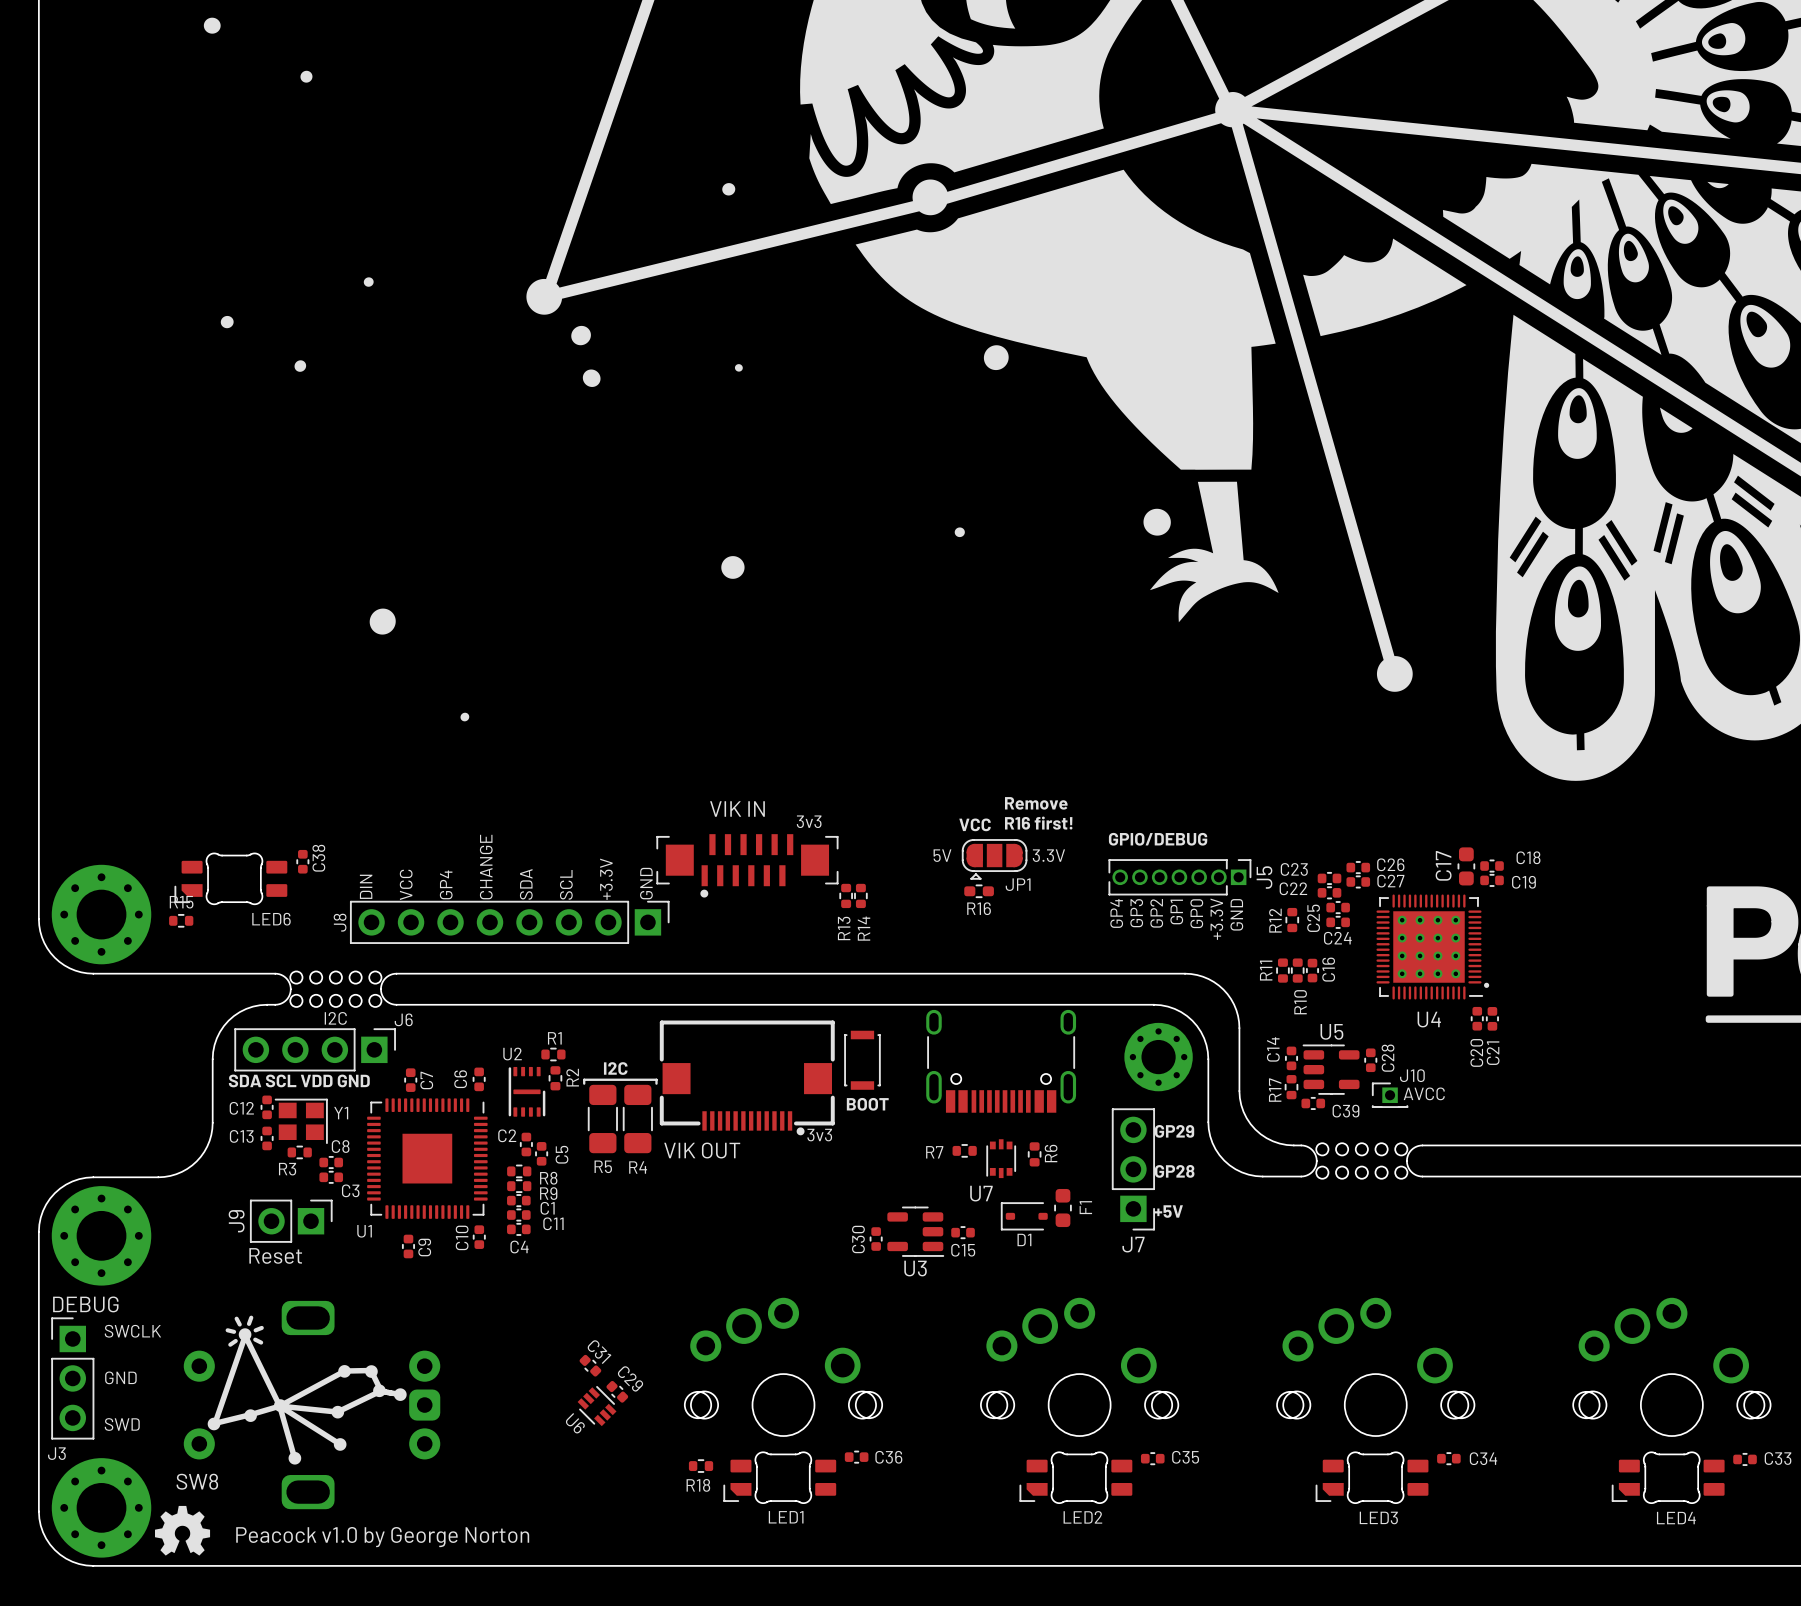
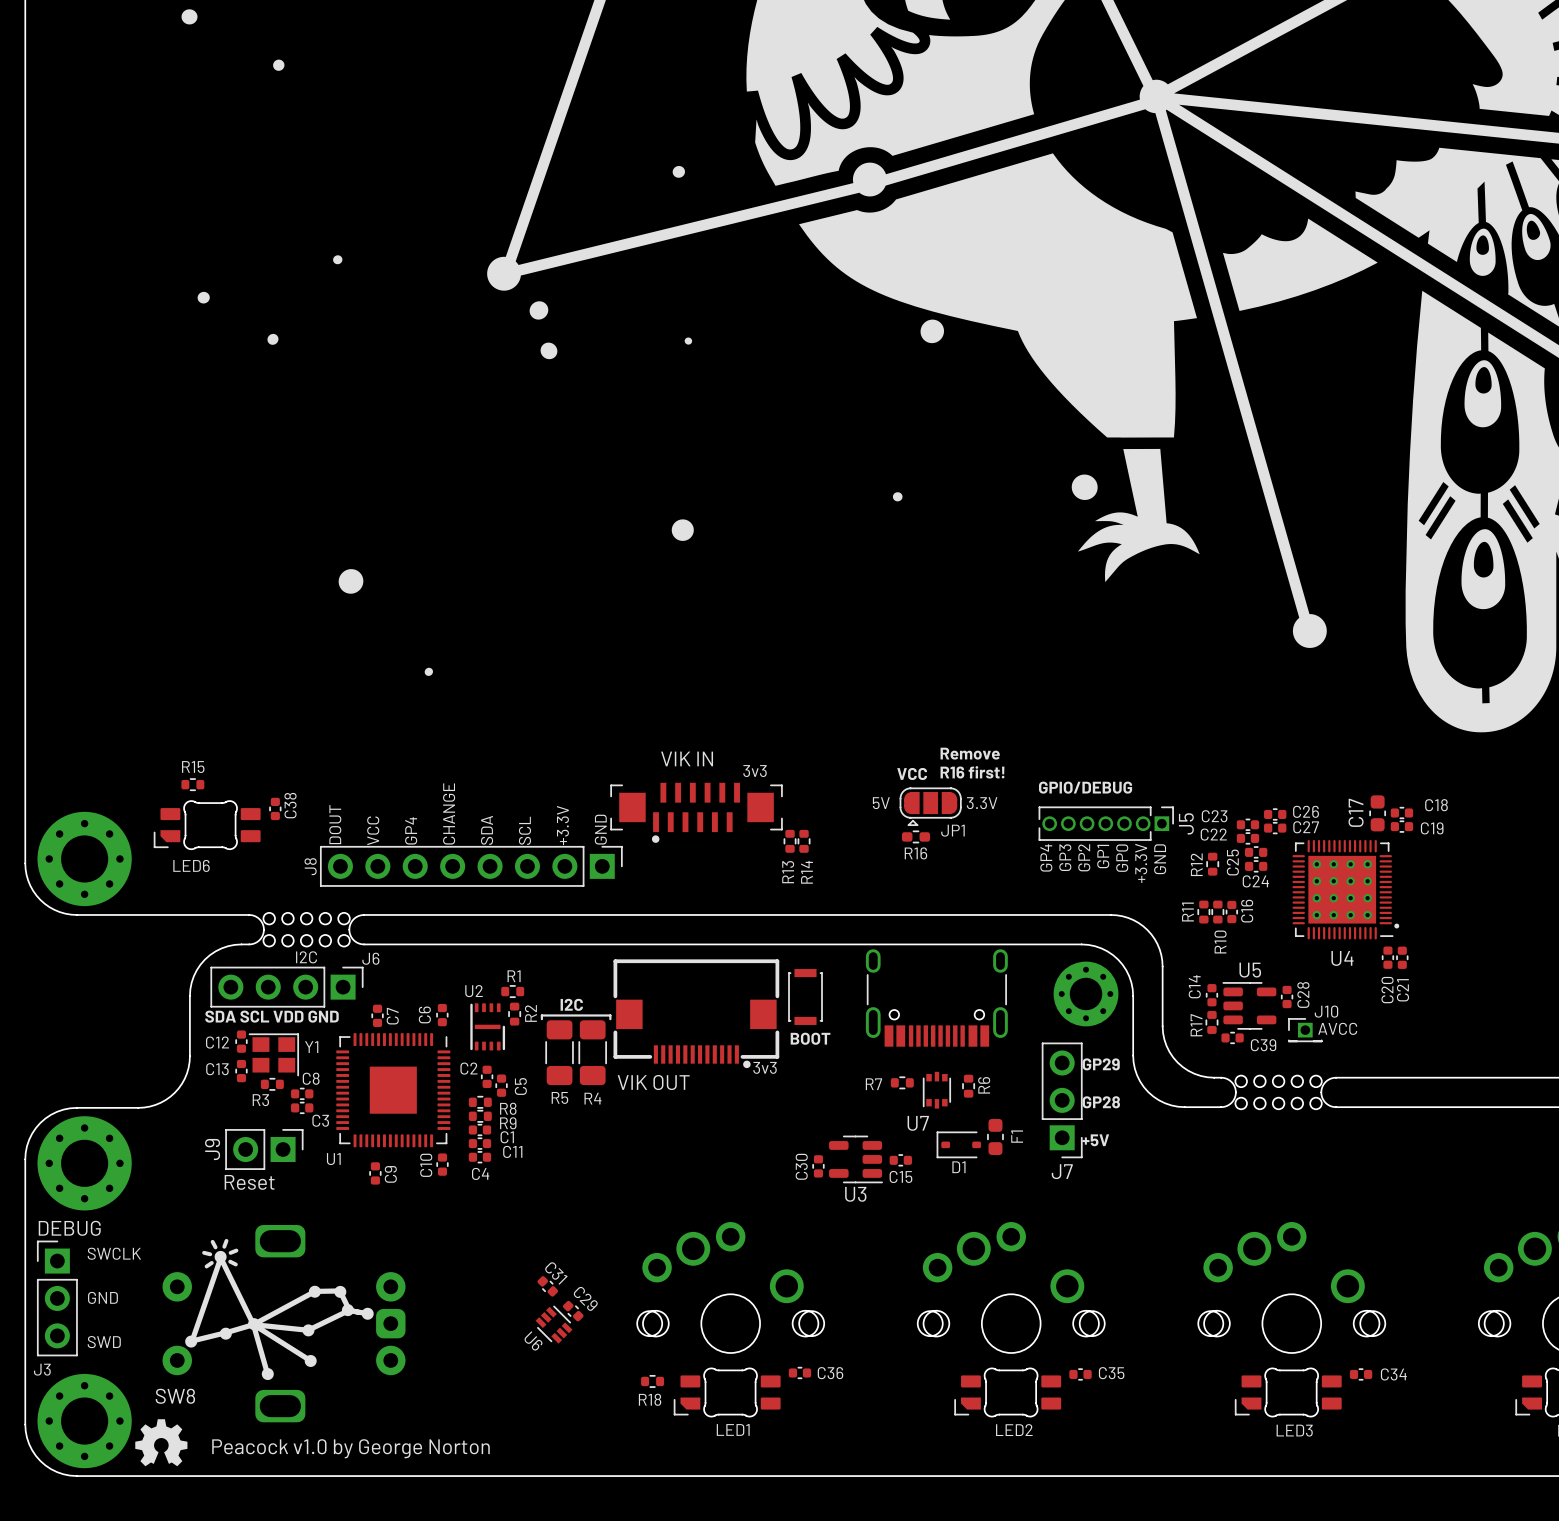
text: DIN (366, 886) -> DOUT (335, 824)
LED6 name position: LED6 (271, 919) -> LED6 (191, 865)
R15 position: (181, 920) -> (192, 784)

